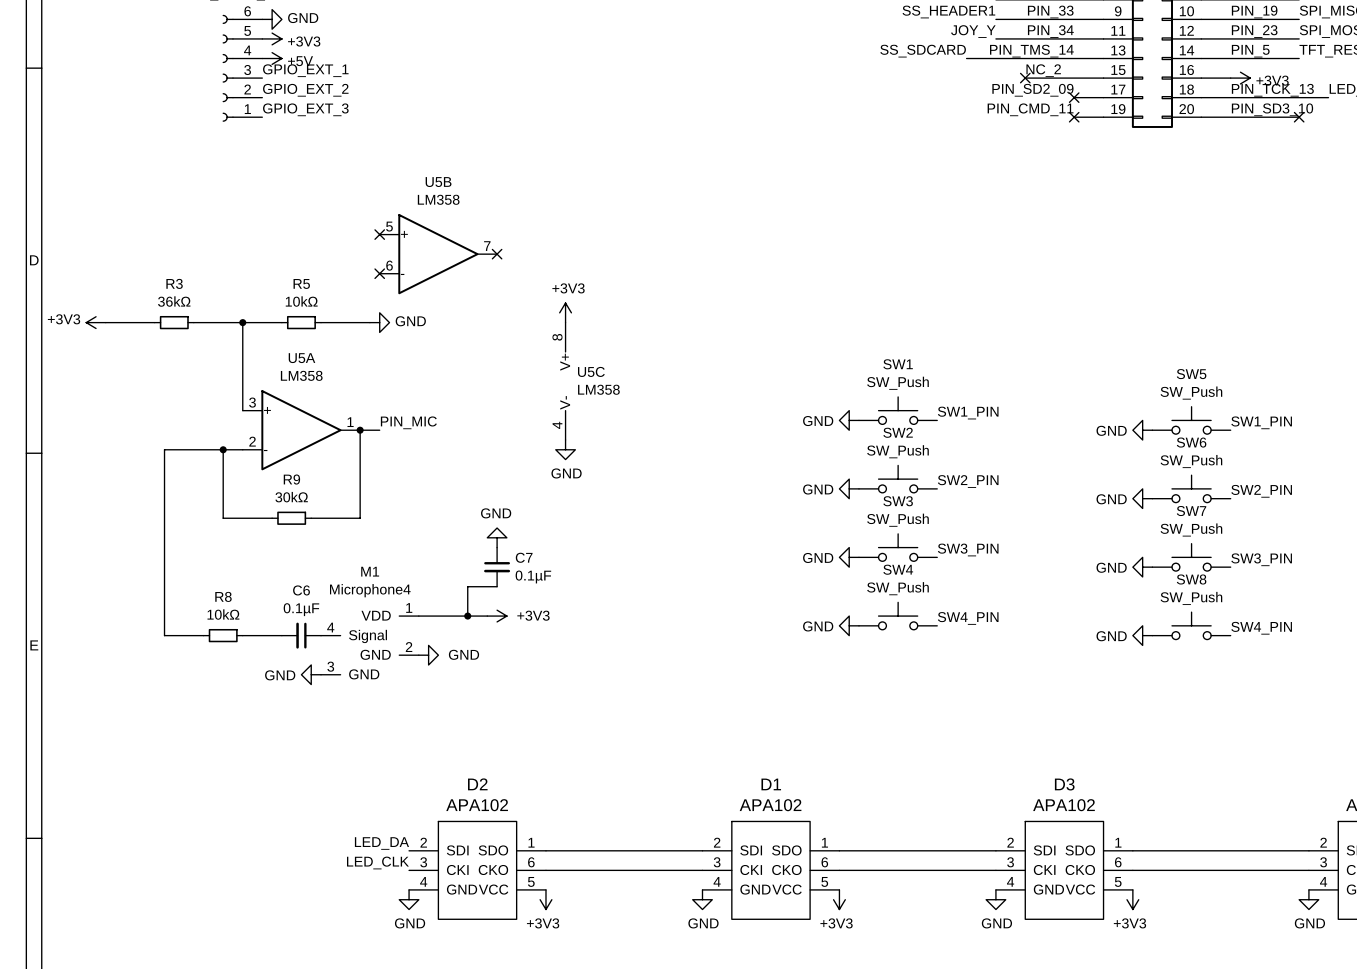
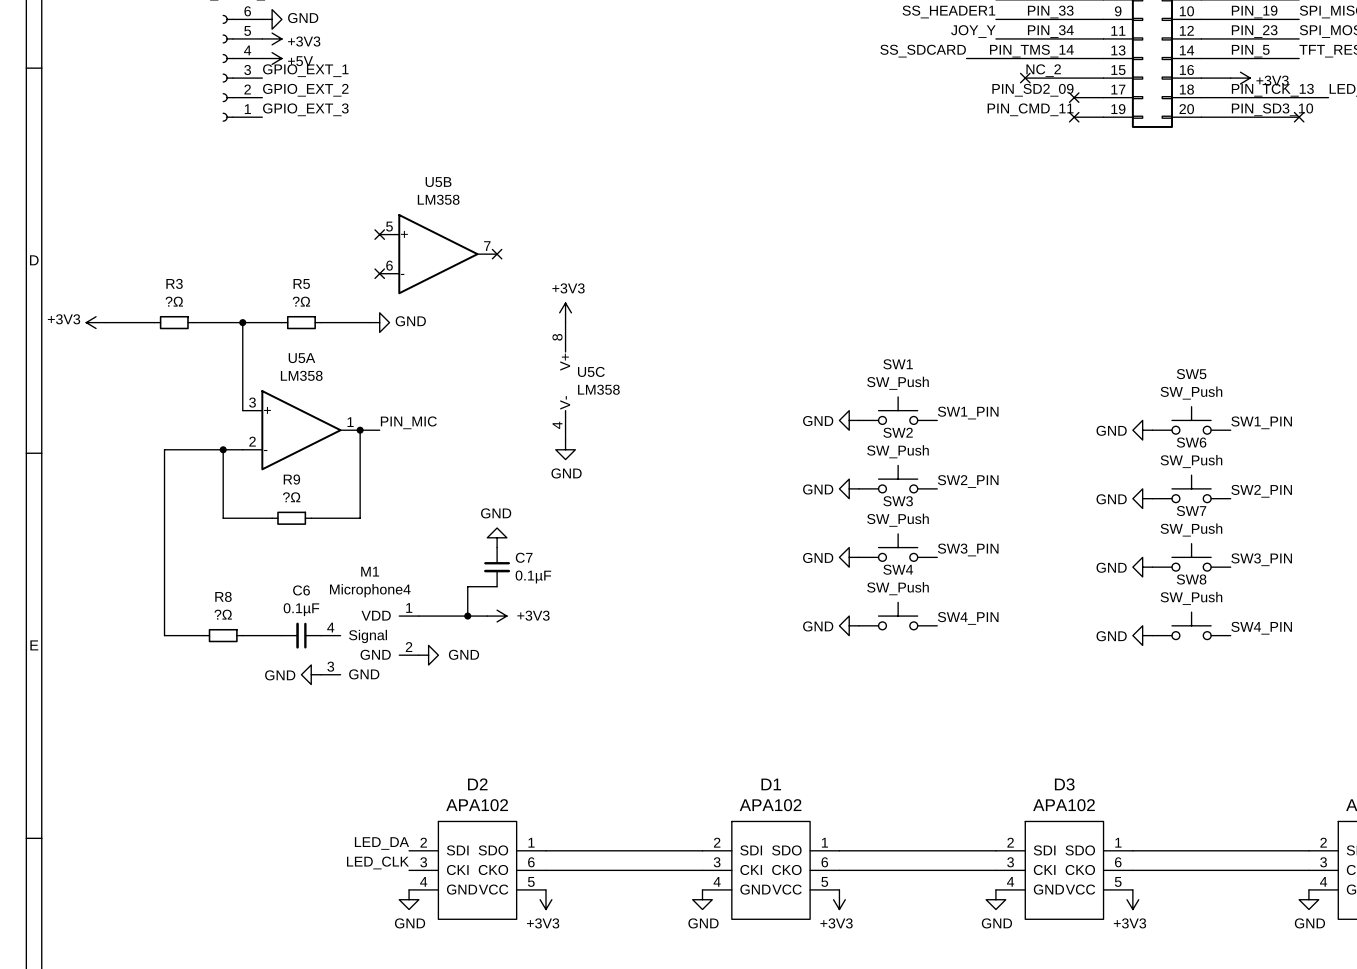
R3 value: 36kΩ (174, 301) -> ?Ω (174, 301)
R5 value: 10kΩ (301, 301) -> ?Ω (301, 301)
R9 value: 30kΩ (291, 497) -> ?Ω (291, 497)
R8 value: 10kΩ (223, 614) -> ?Ω (223, 614)

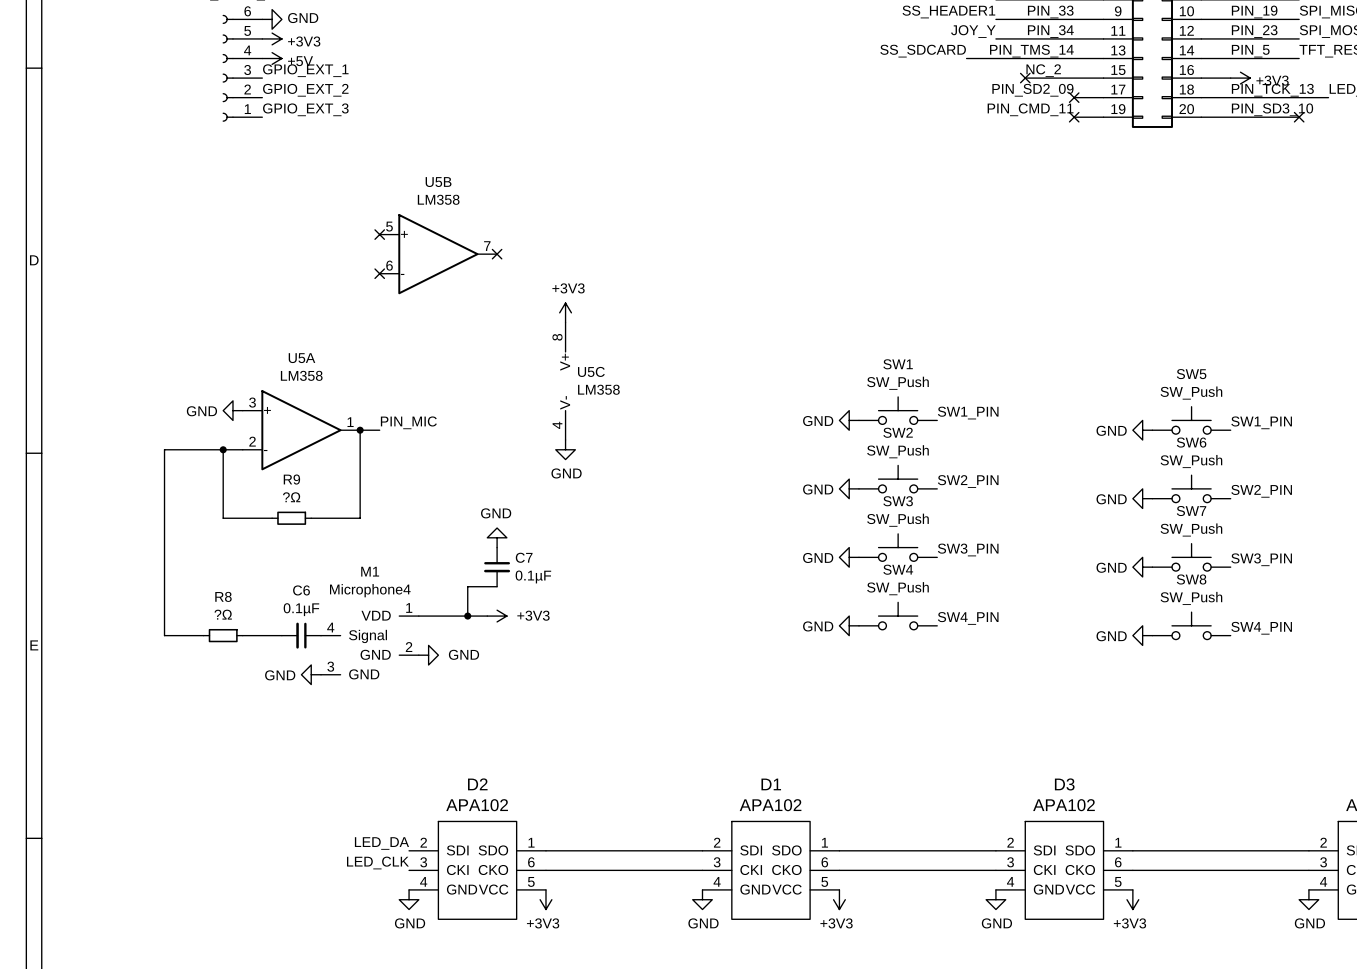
power symbol: +3V3 (96, 322) -> none
wire: (105, 322) (154, 322) -> none
R3: ?Ω (174, 322) -> none
wire: (193, 322) (281, 322) -> none
wire: (242, 322) (242, 410) -> none
junction: (242, 322) -> none
R5: ?Ω (301, 322) -> none
wire: (321, 322) (369, 322) -> none
power symbol rotation: 0° (379, 322) -> 180° (232, 410)
power symbol position: GND (379, 322) -> GND (232, 410)

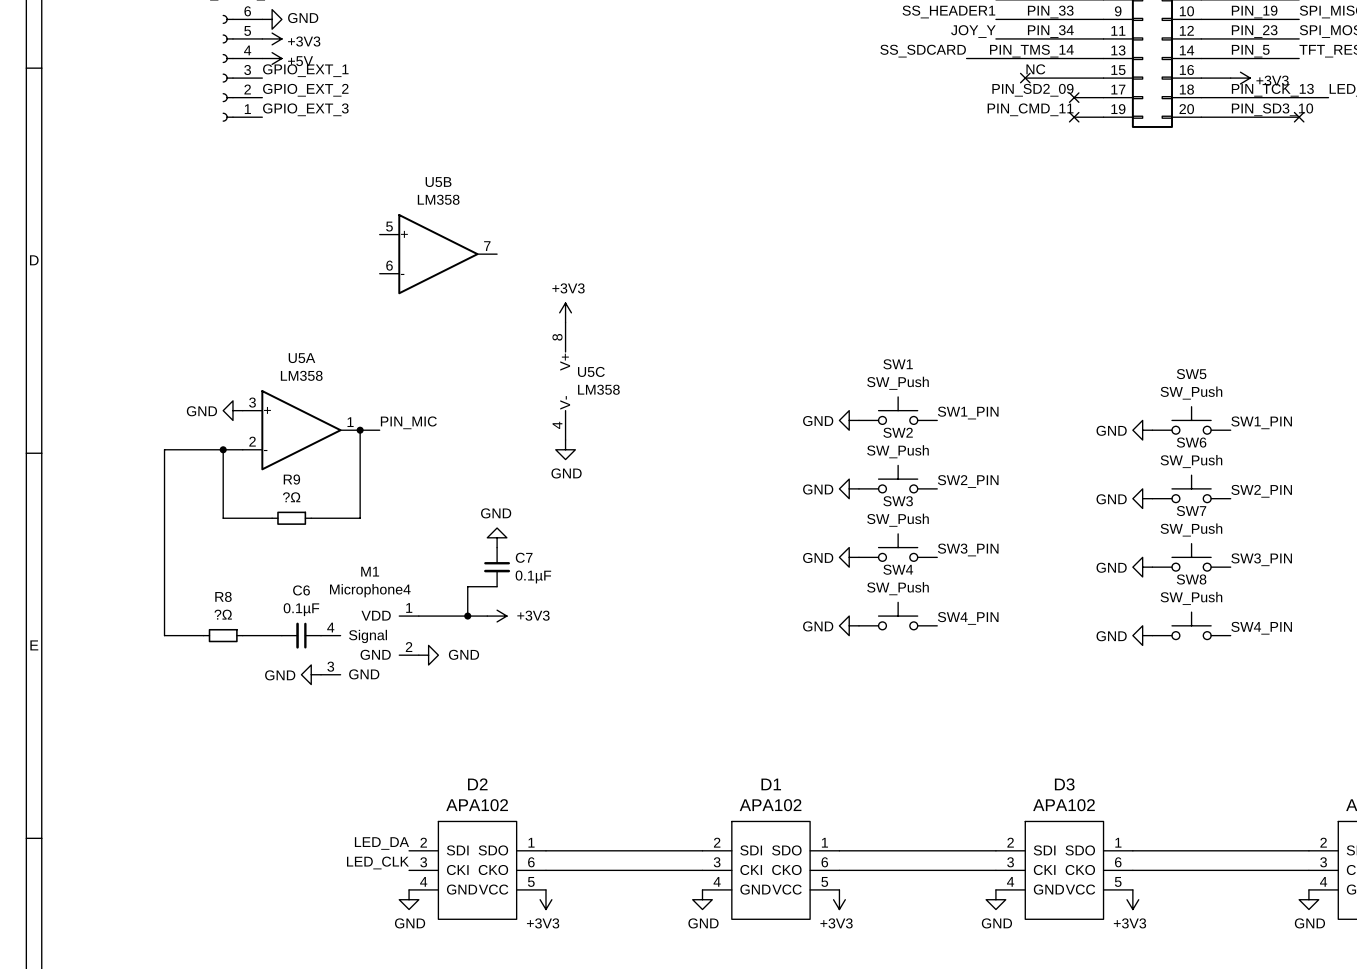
label: NC_2 (1043, 70) -> NC (1035, 69)
no-connect mark: (379, 234) -> none
no-connect mark: (497, 254) -> none
no-connect mark: (379, 273) -> none

